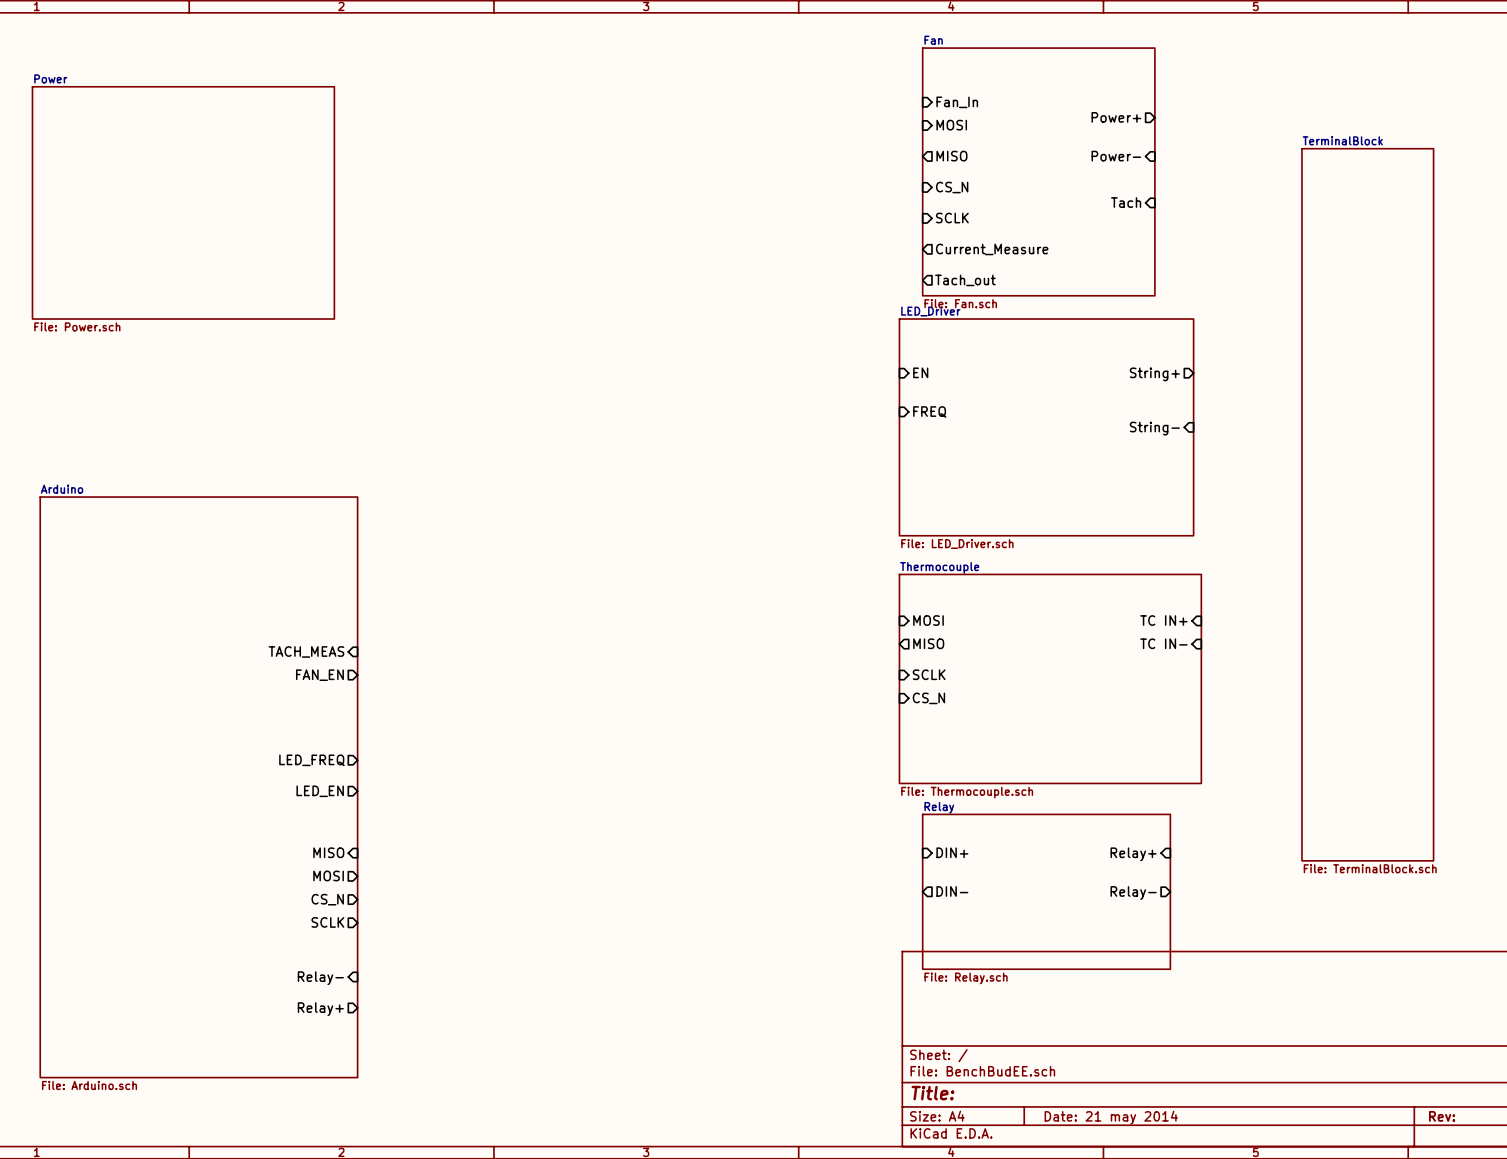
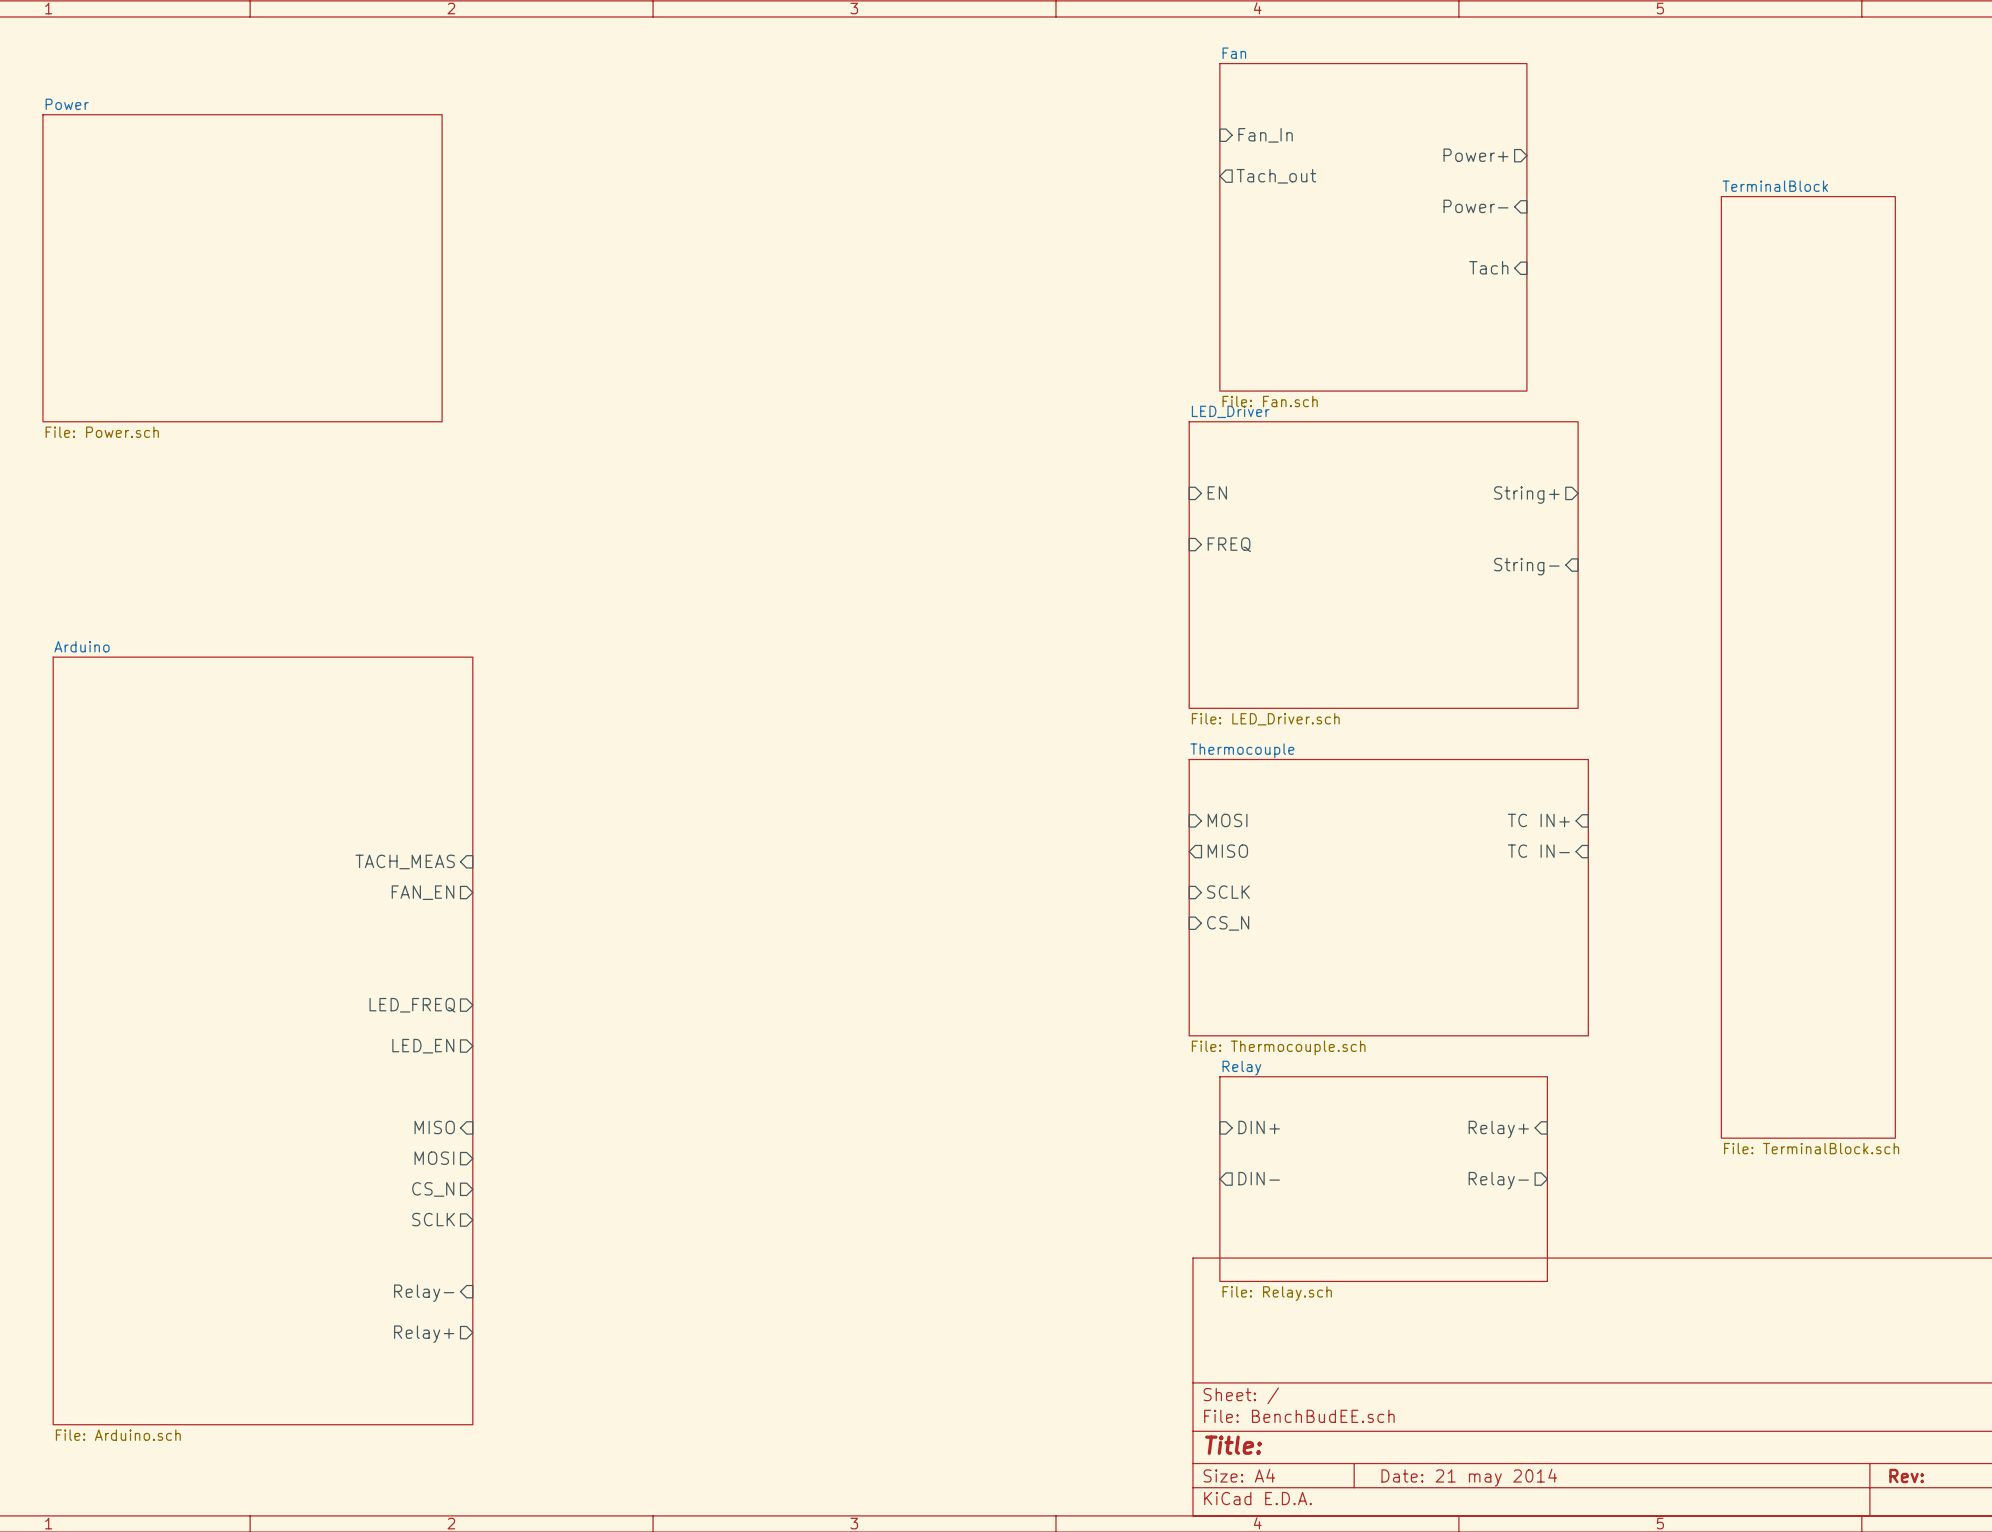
sheet pin: MOSI (951, 125) -> none
sheet pin: MISO (951, 156) -> none
sheet pin: CS_N (952, 187) -> none
sheet pin: SCLK (952, 218) -> none
sheet pin: Current_Measure (992, 249) -> none
sheet pin position: Tach_out (965, 280) -> Tach_out (1276, 176)

